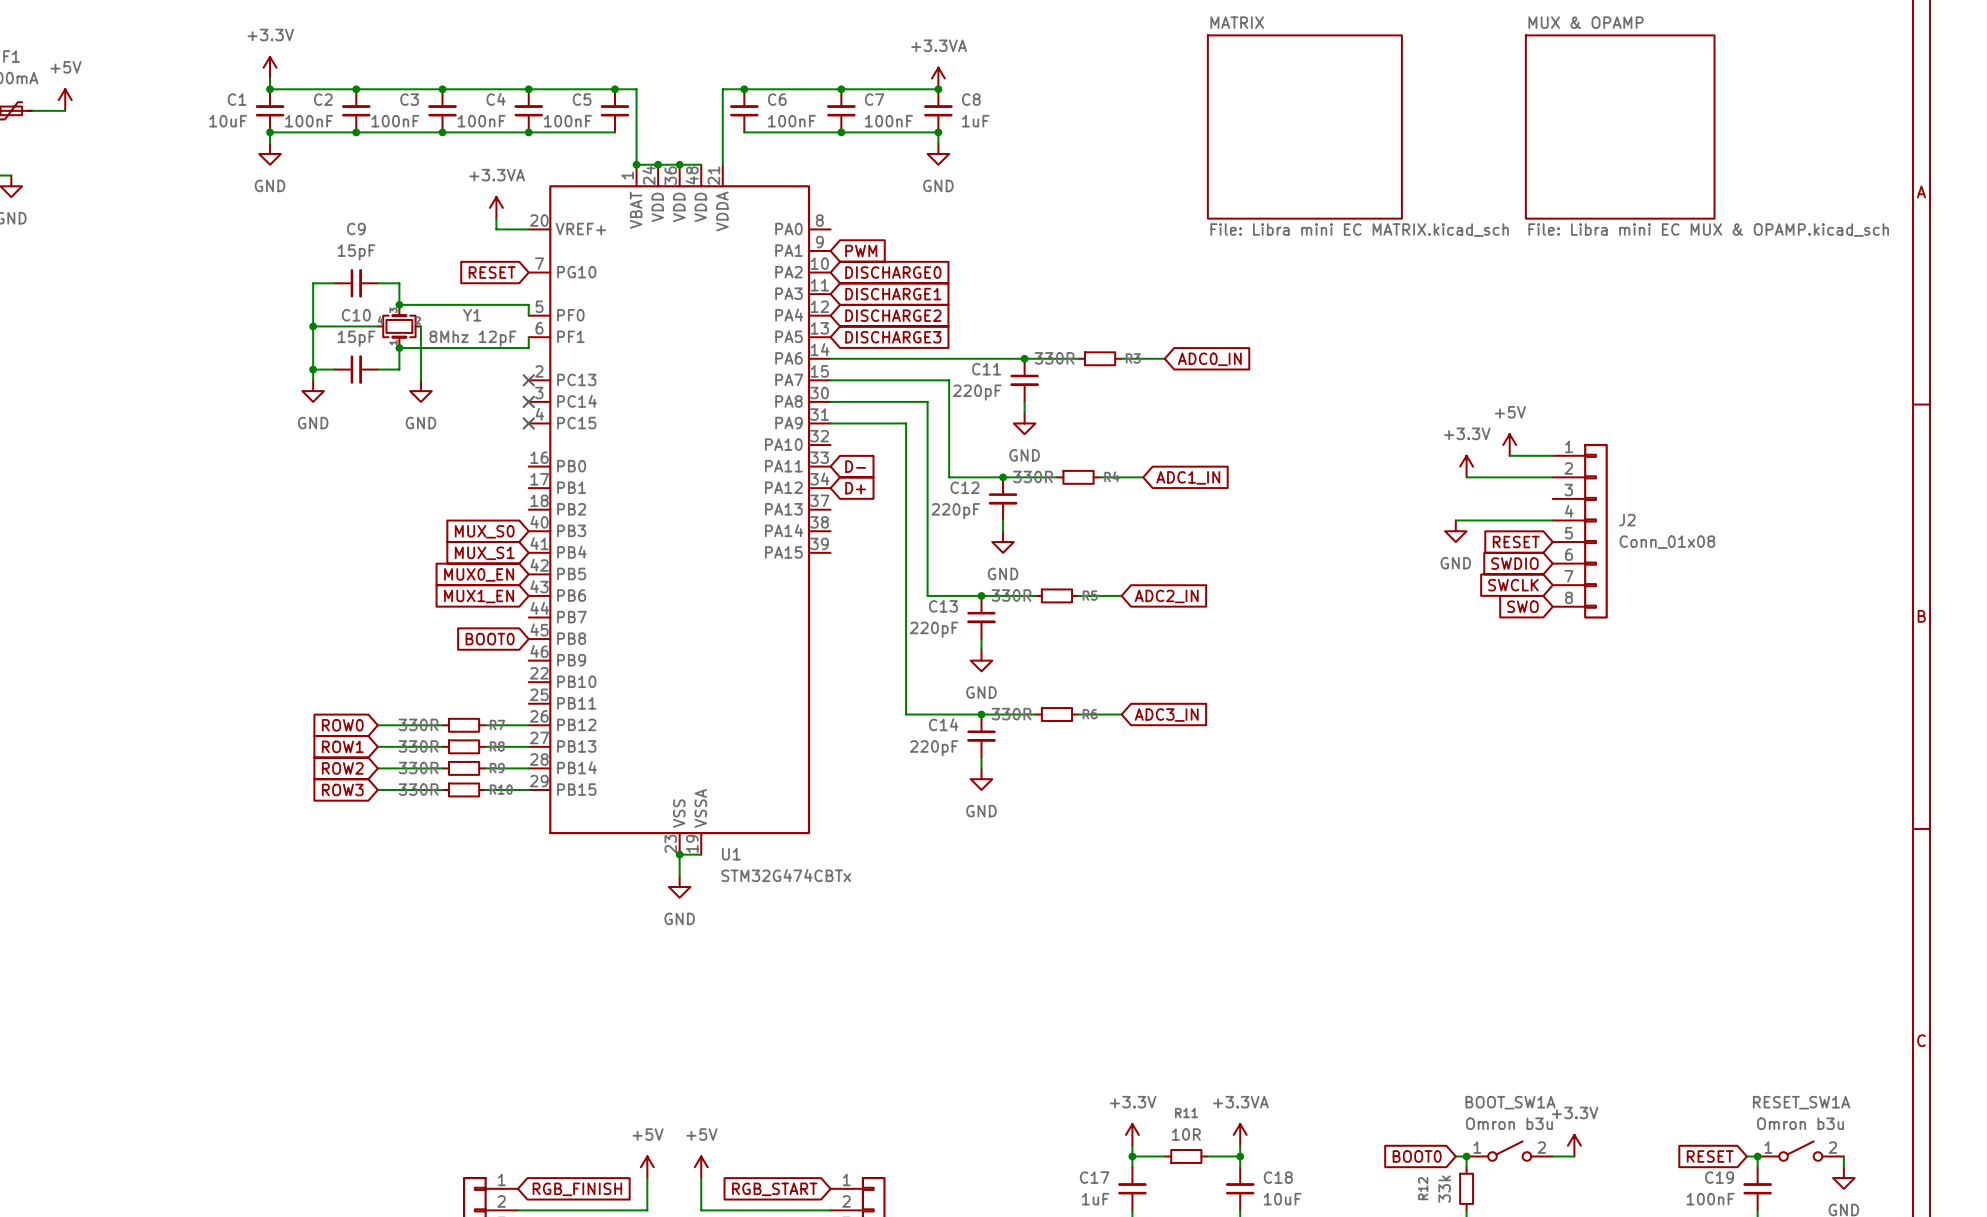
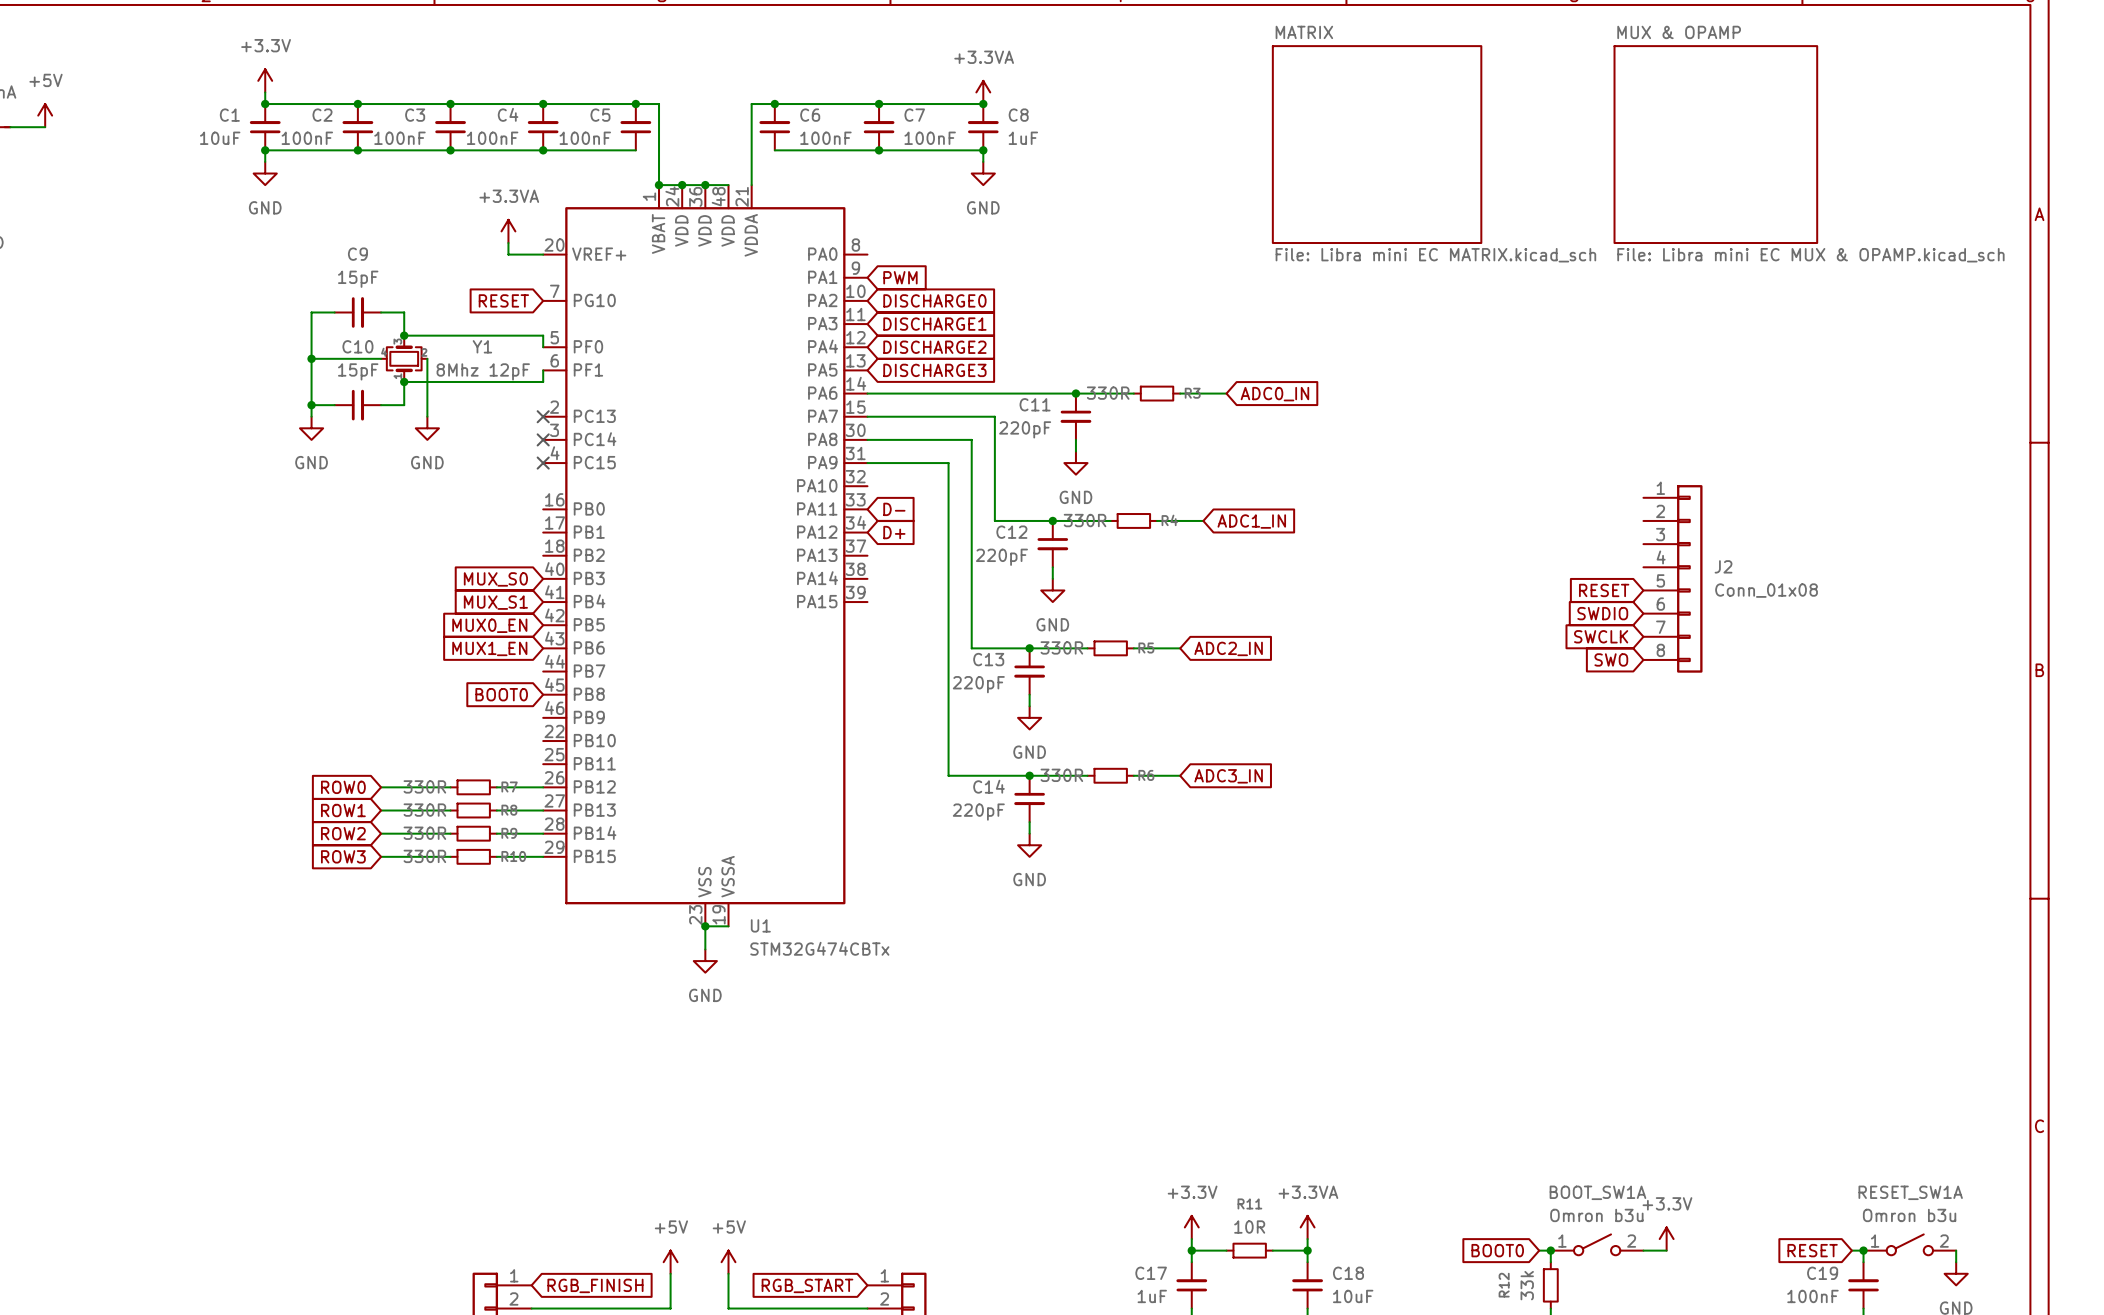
power symbol: +5V (1509, 445) -> none
wire: (1509, 455) (1552, 455) -> none
power symbol: +3.3V (1466, 466) -> none
wire: (1466, 477) (1552, 477) -> none
wire: (1455, 520) (1552, 520) -> none
power symbol: GND (1455, 531) -> none

